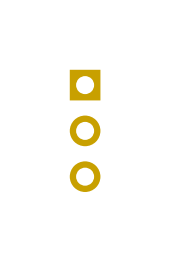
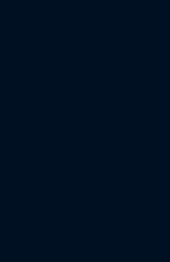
part: (85, 130) -> none

